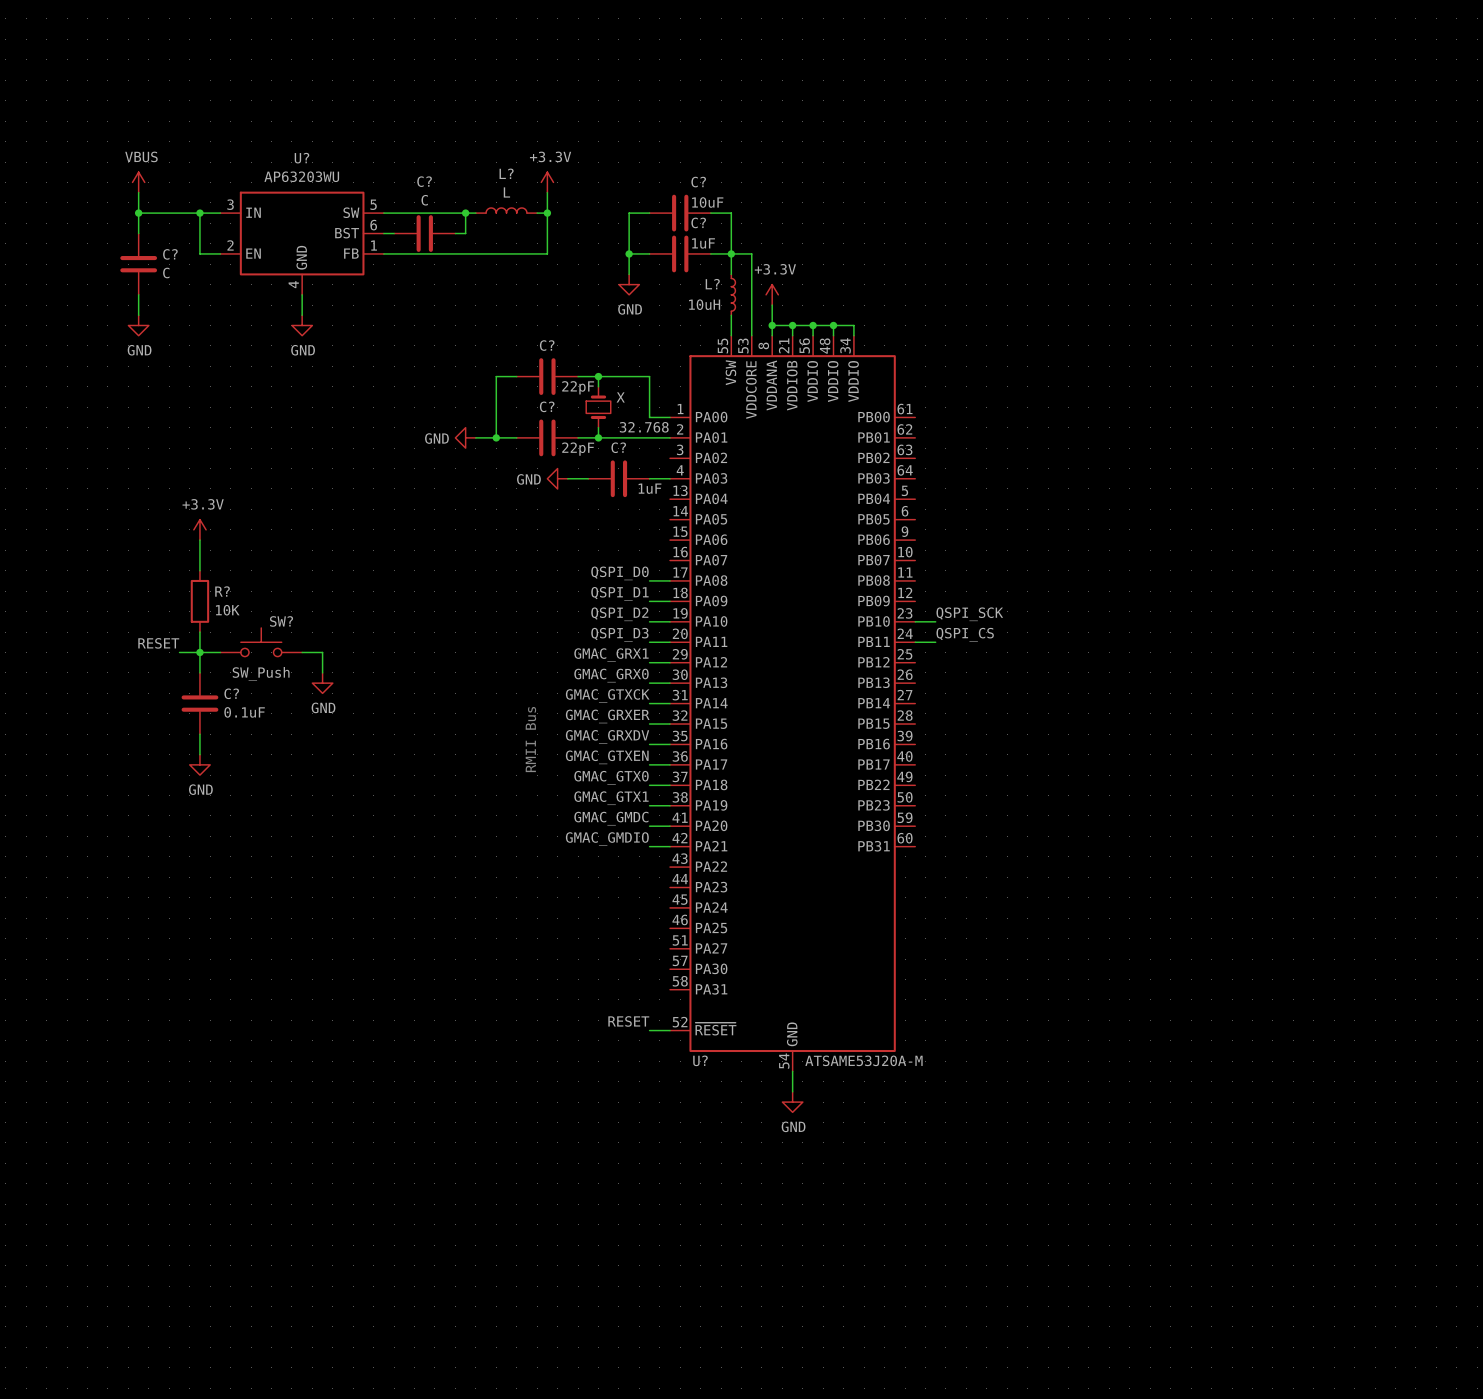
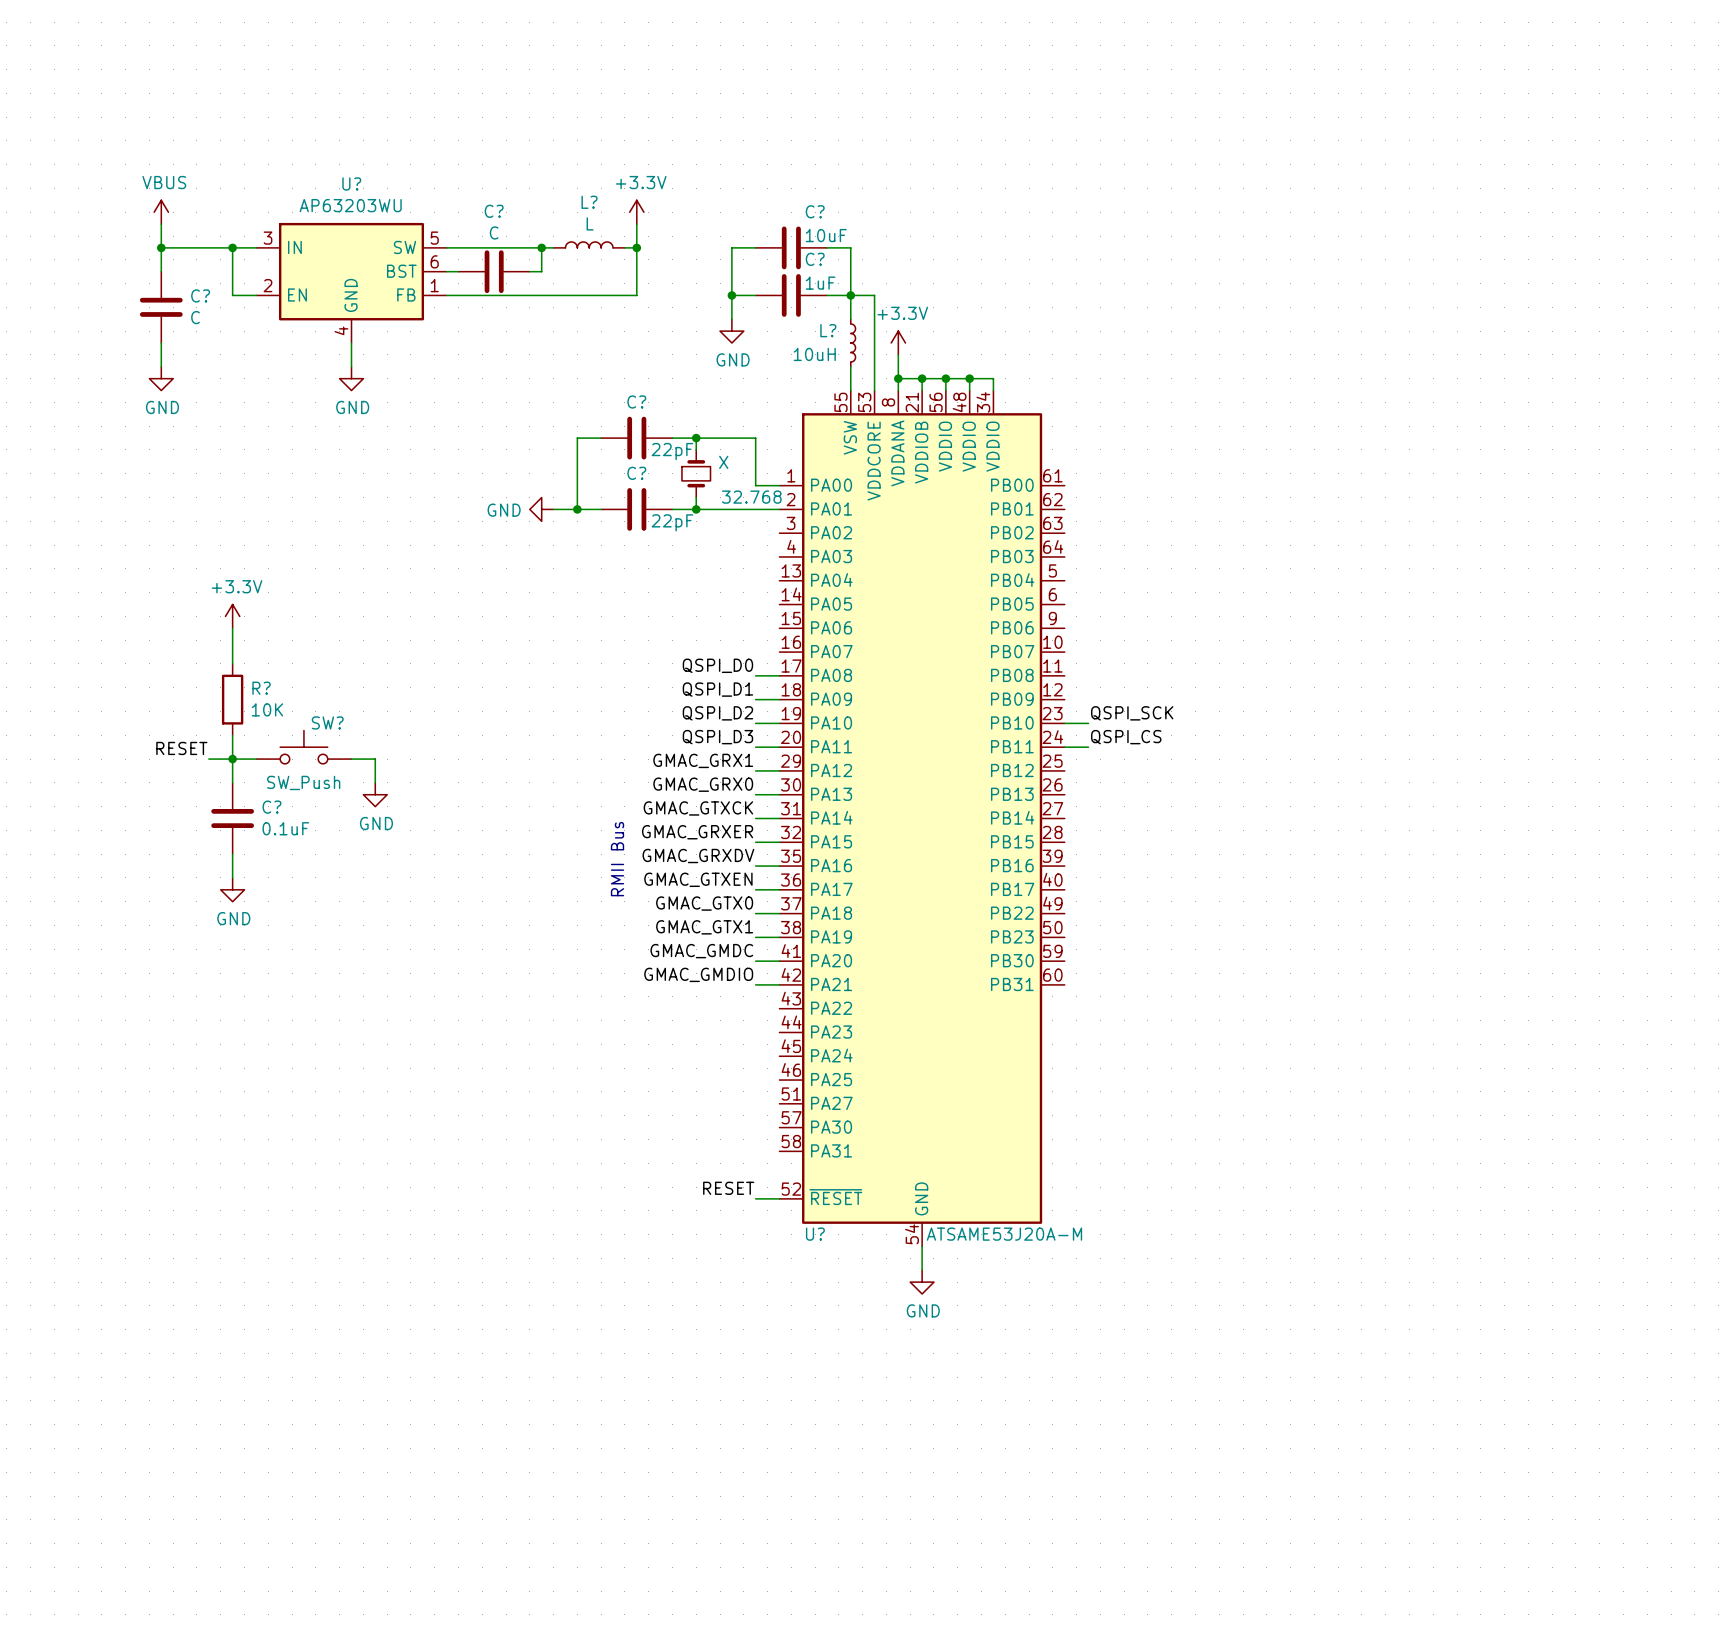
power symbol: GND (557, 478) -> none
wire: (567, 478) (588, 478) -> none
C?: 1uF (618, 478) -> none
wire: (649, 478) (670, 478) -> none

